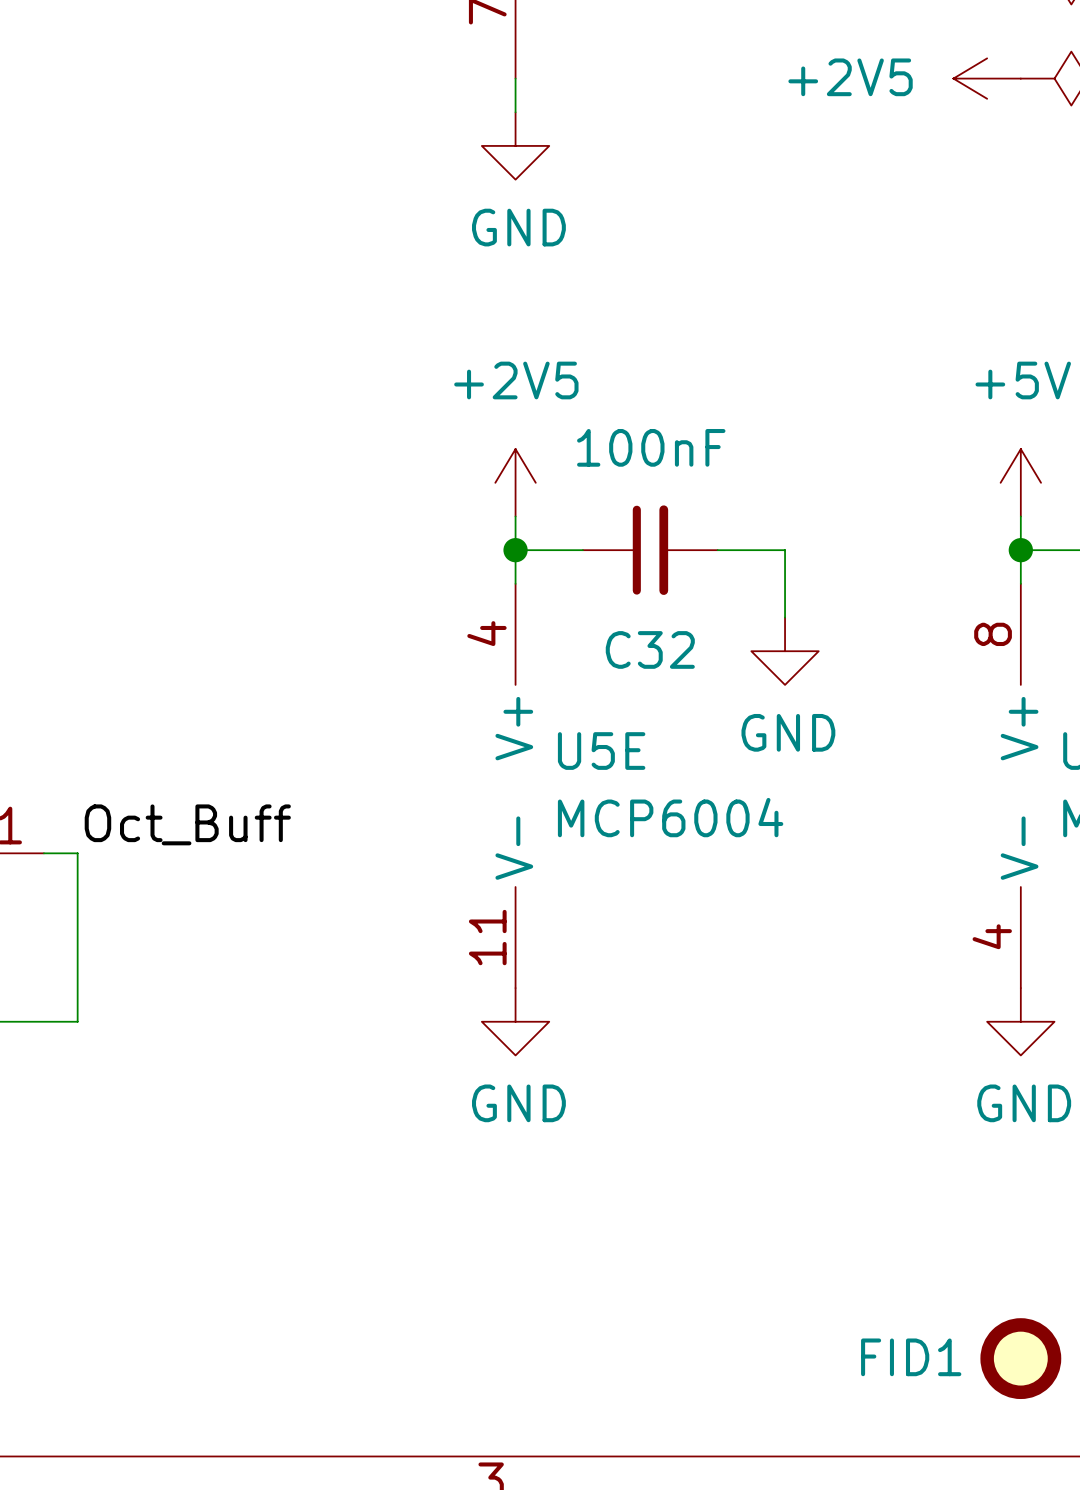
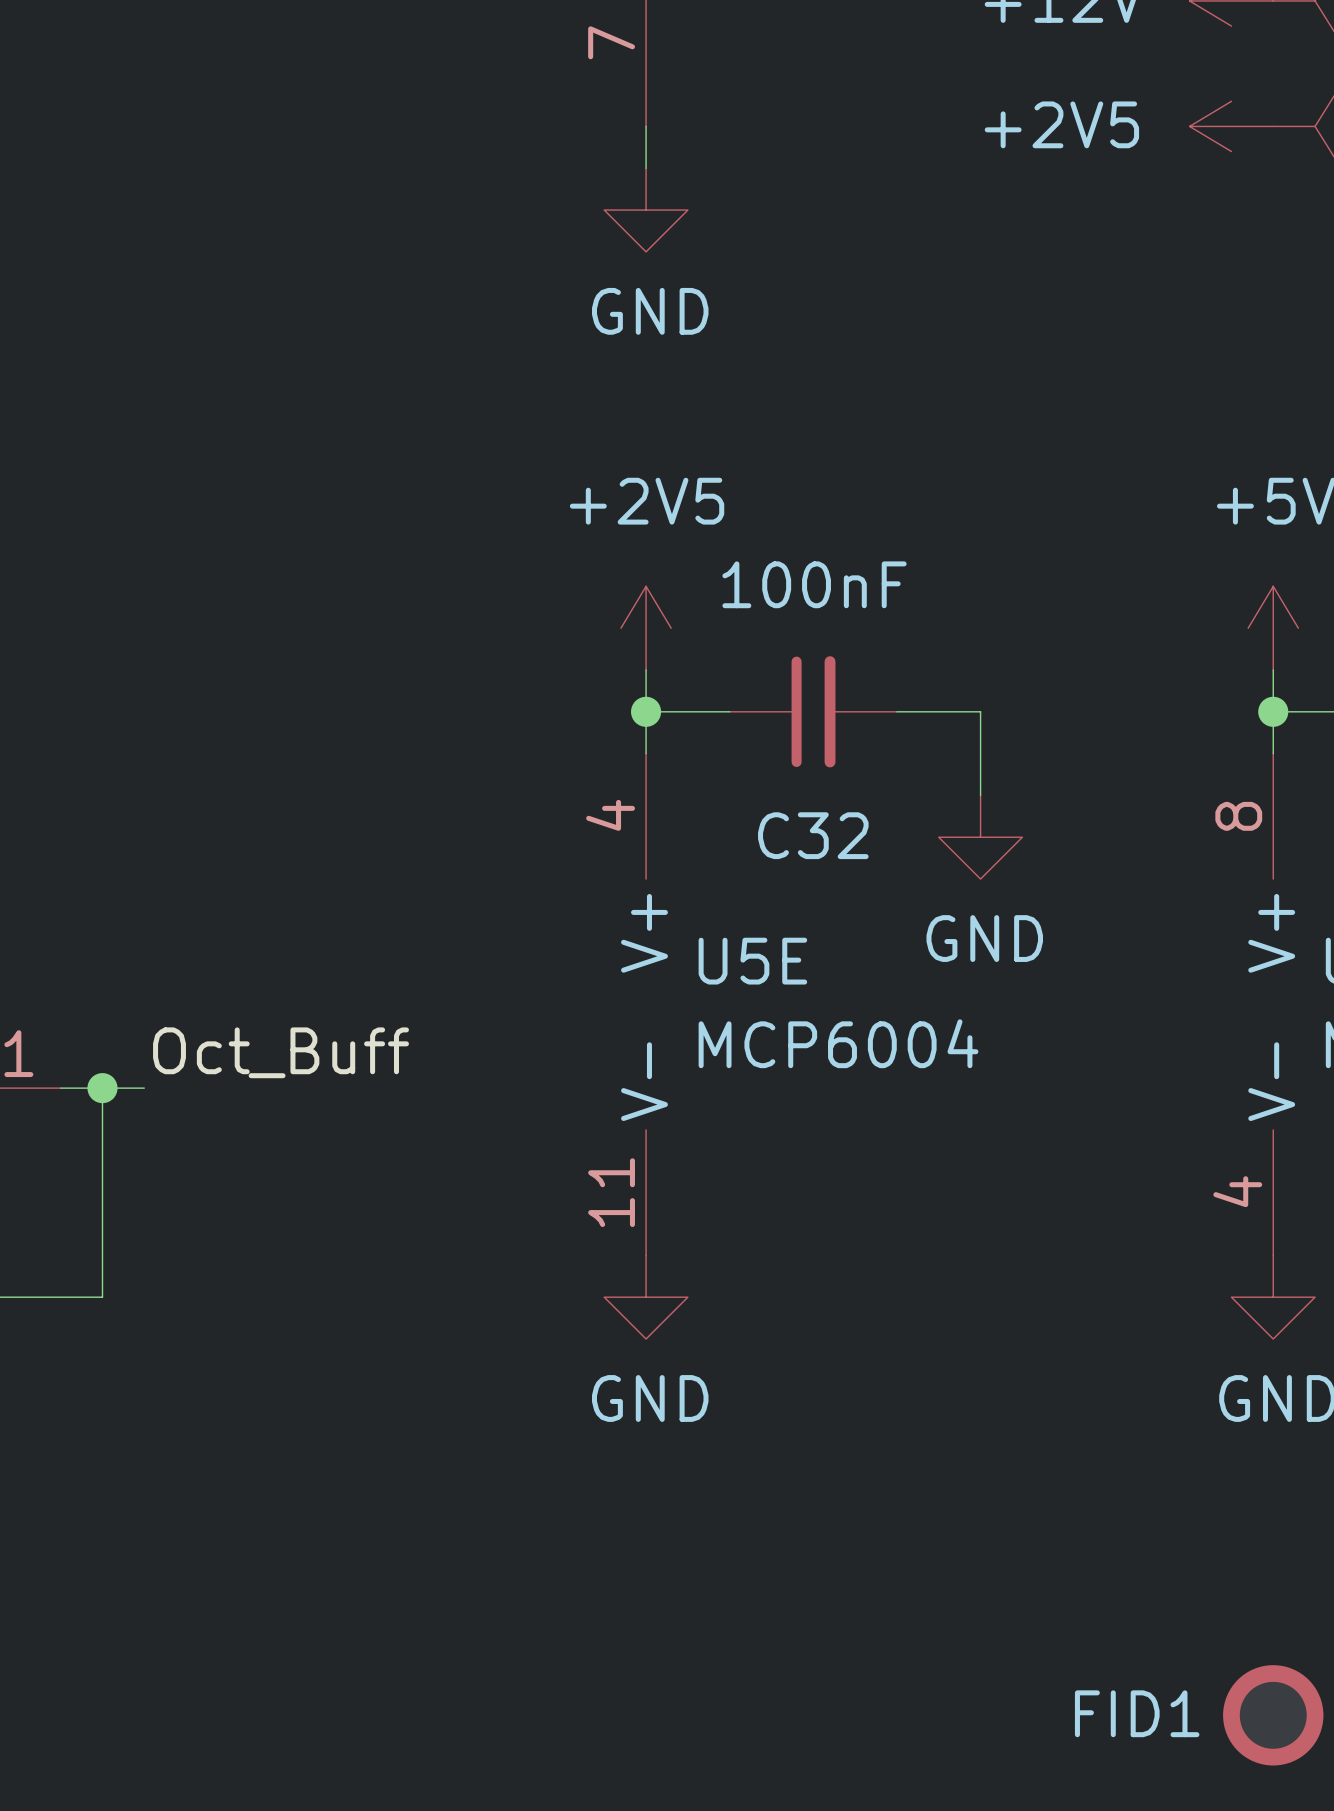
label position: Oct_Buff (187, 824) -> Oct_Buff (281, 1052)
wire: none -> (102, 1088) (144, 1088)
junction: none -> (102, 1088)

